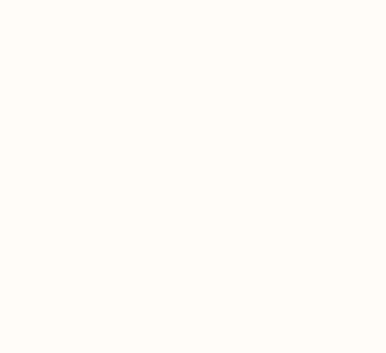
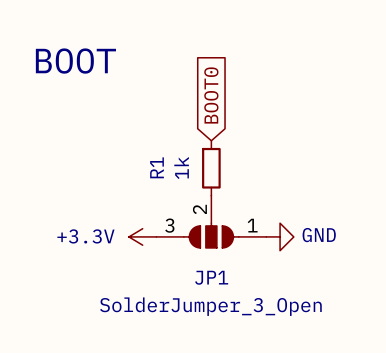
text: none -> BOOT (75, 61)
global label: none -> BOOT0 (211, 95)
R1: none -> 1k (211, 168)
JP1: none -> SolderJumper_3_Open (211, 221)
power symbol: none -> +3.3V (142, 236)
power symbol: none -> GND (280, 236)

